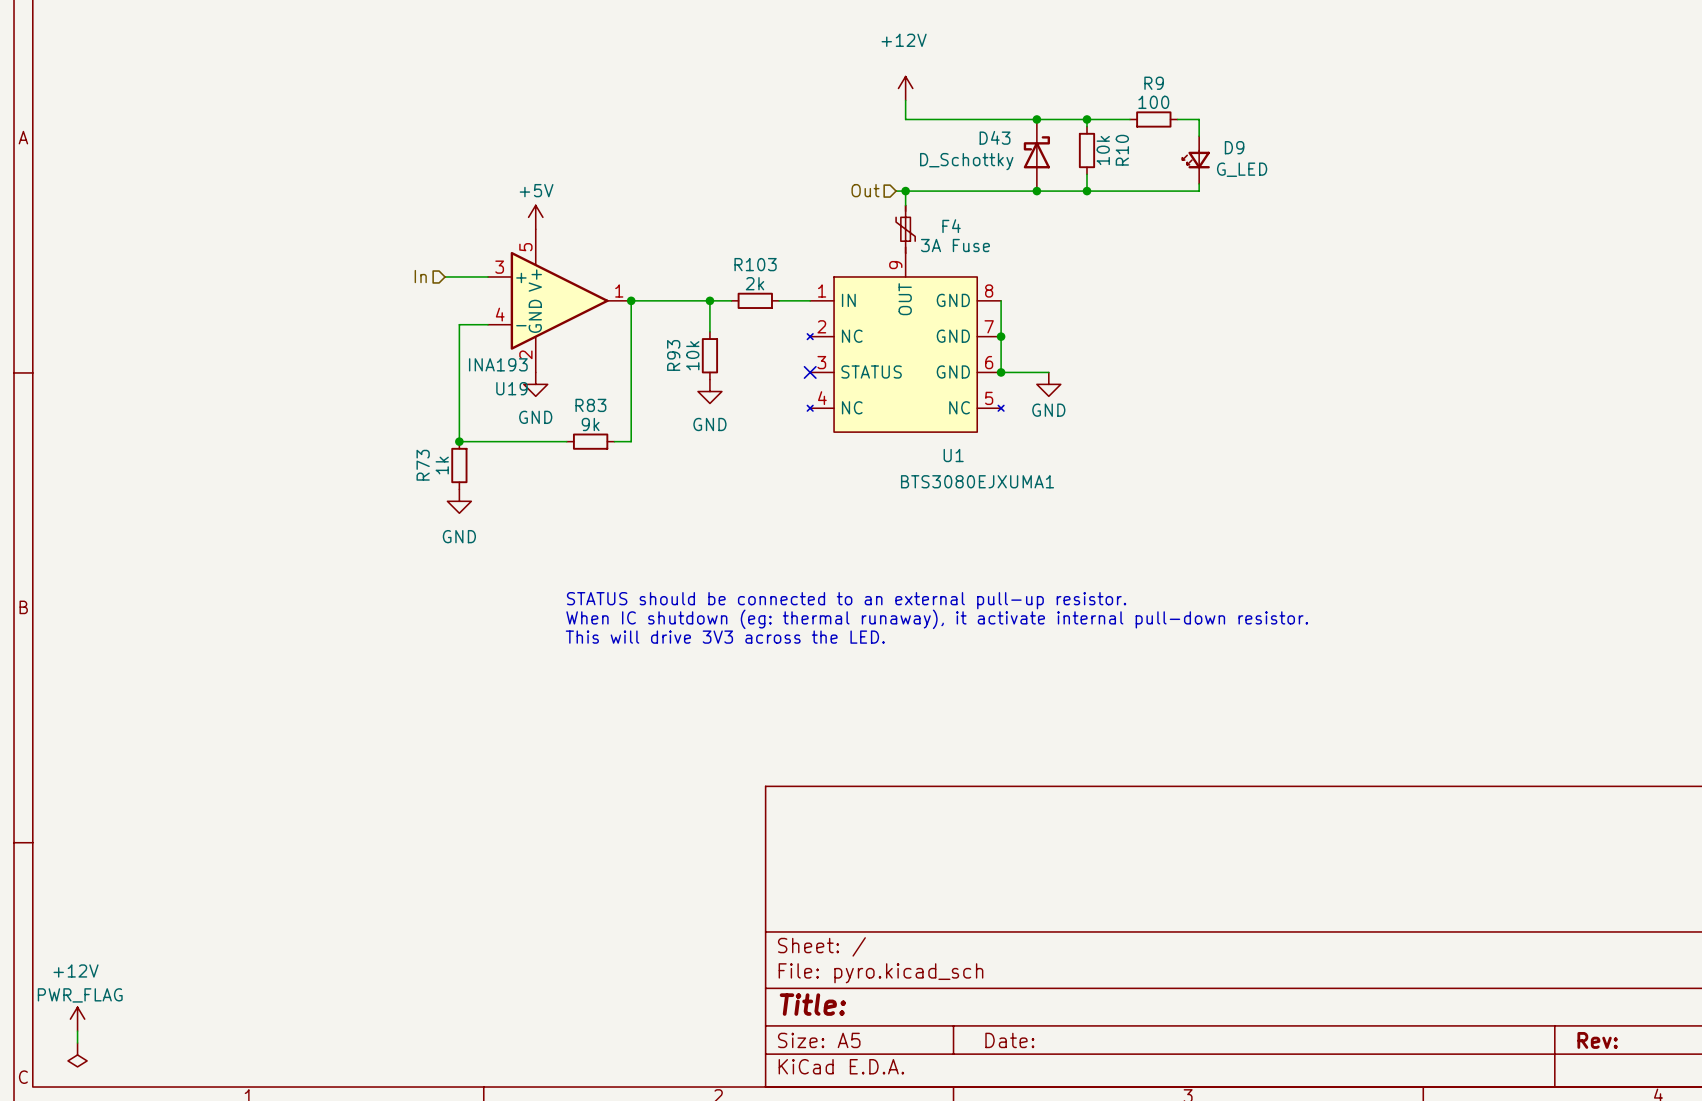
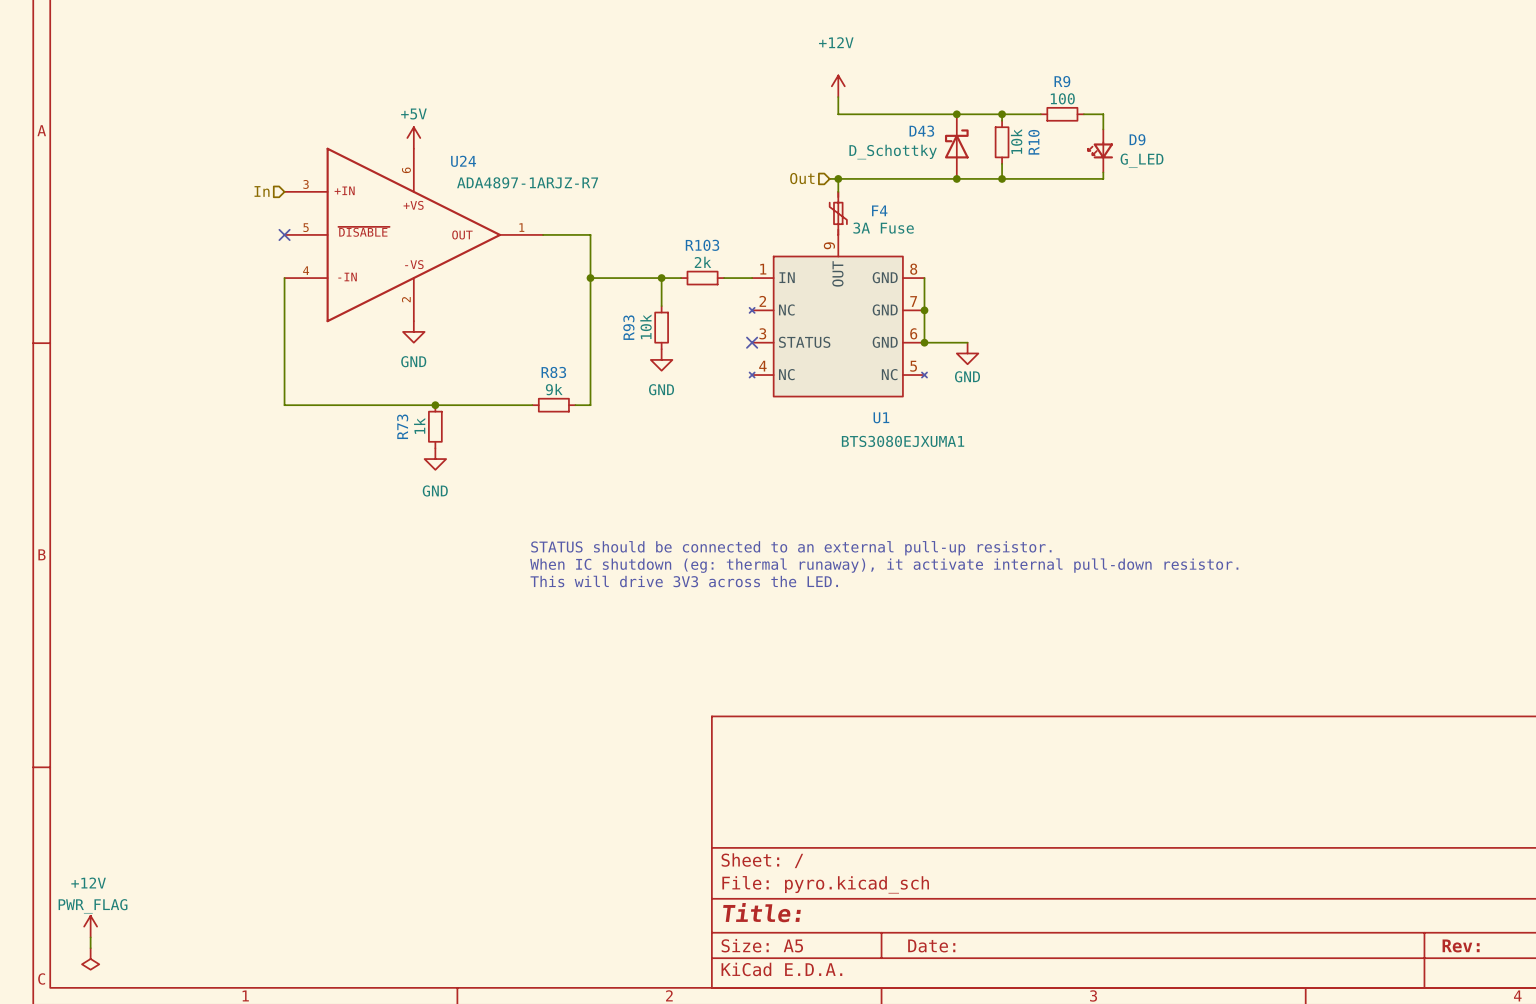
power symbol position: +5V (535, 217) -> +5V (413, 138)
no-connect mark: none -> (284, 234)
U24: none -> ADA4897-1ARJZ-R7 (413, 234)
wire: none -> (543, 234) (590, 234) (590, 278)
hierarchical label position: In (420, 276) -> In (262, 191)
wire: (445, 276) (488, 276) -> none
U19: INA193 (559, 300) -> none
wire: (488, 324) (459, 324) (459, 441) -> (284, 278) (284, 405) (435, 405)
power symbol position: GND (535, 384) -> GND (413, 331)

